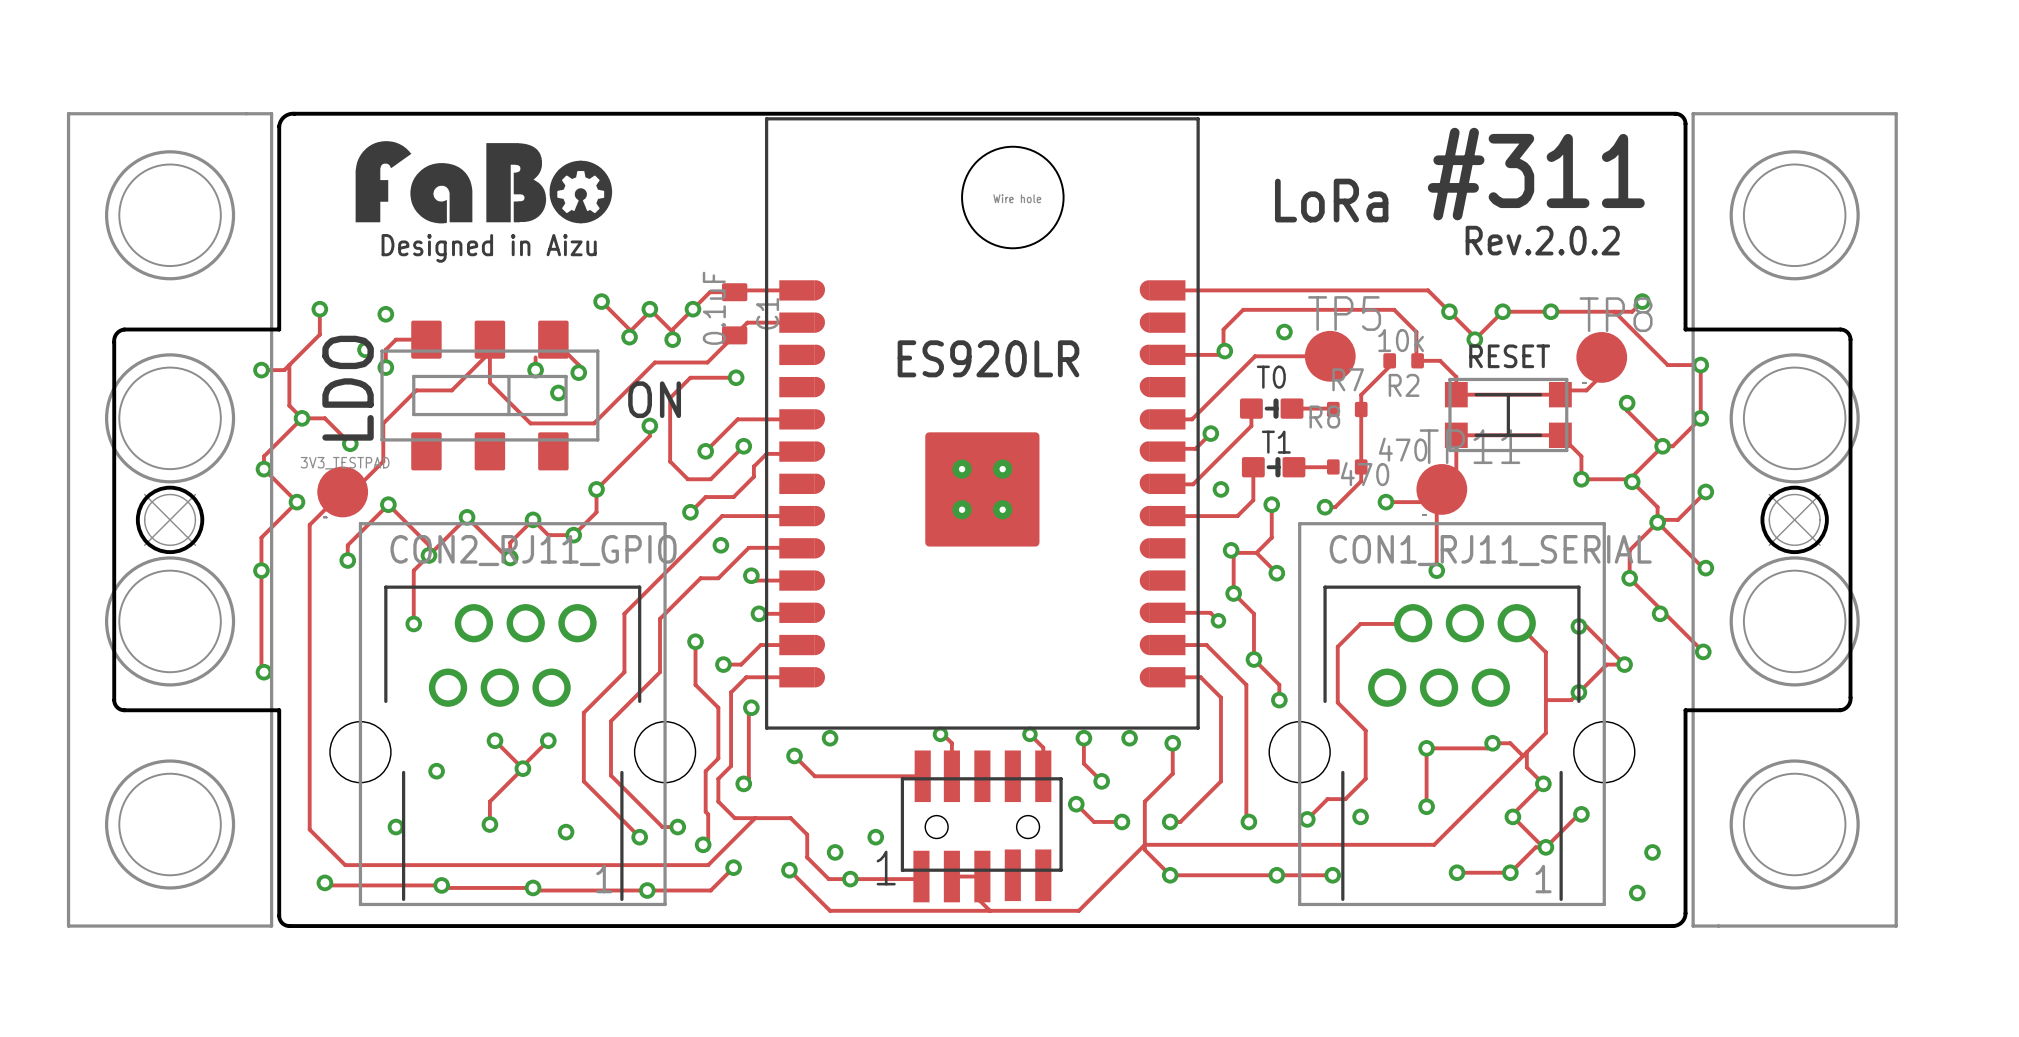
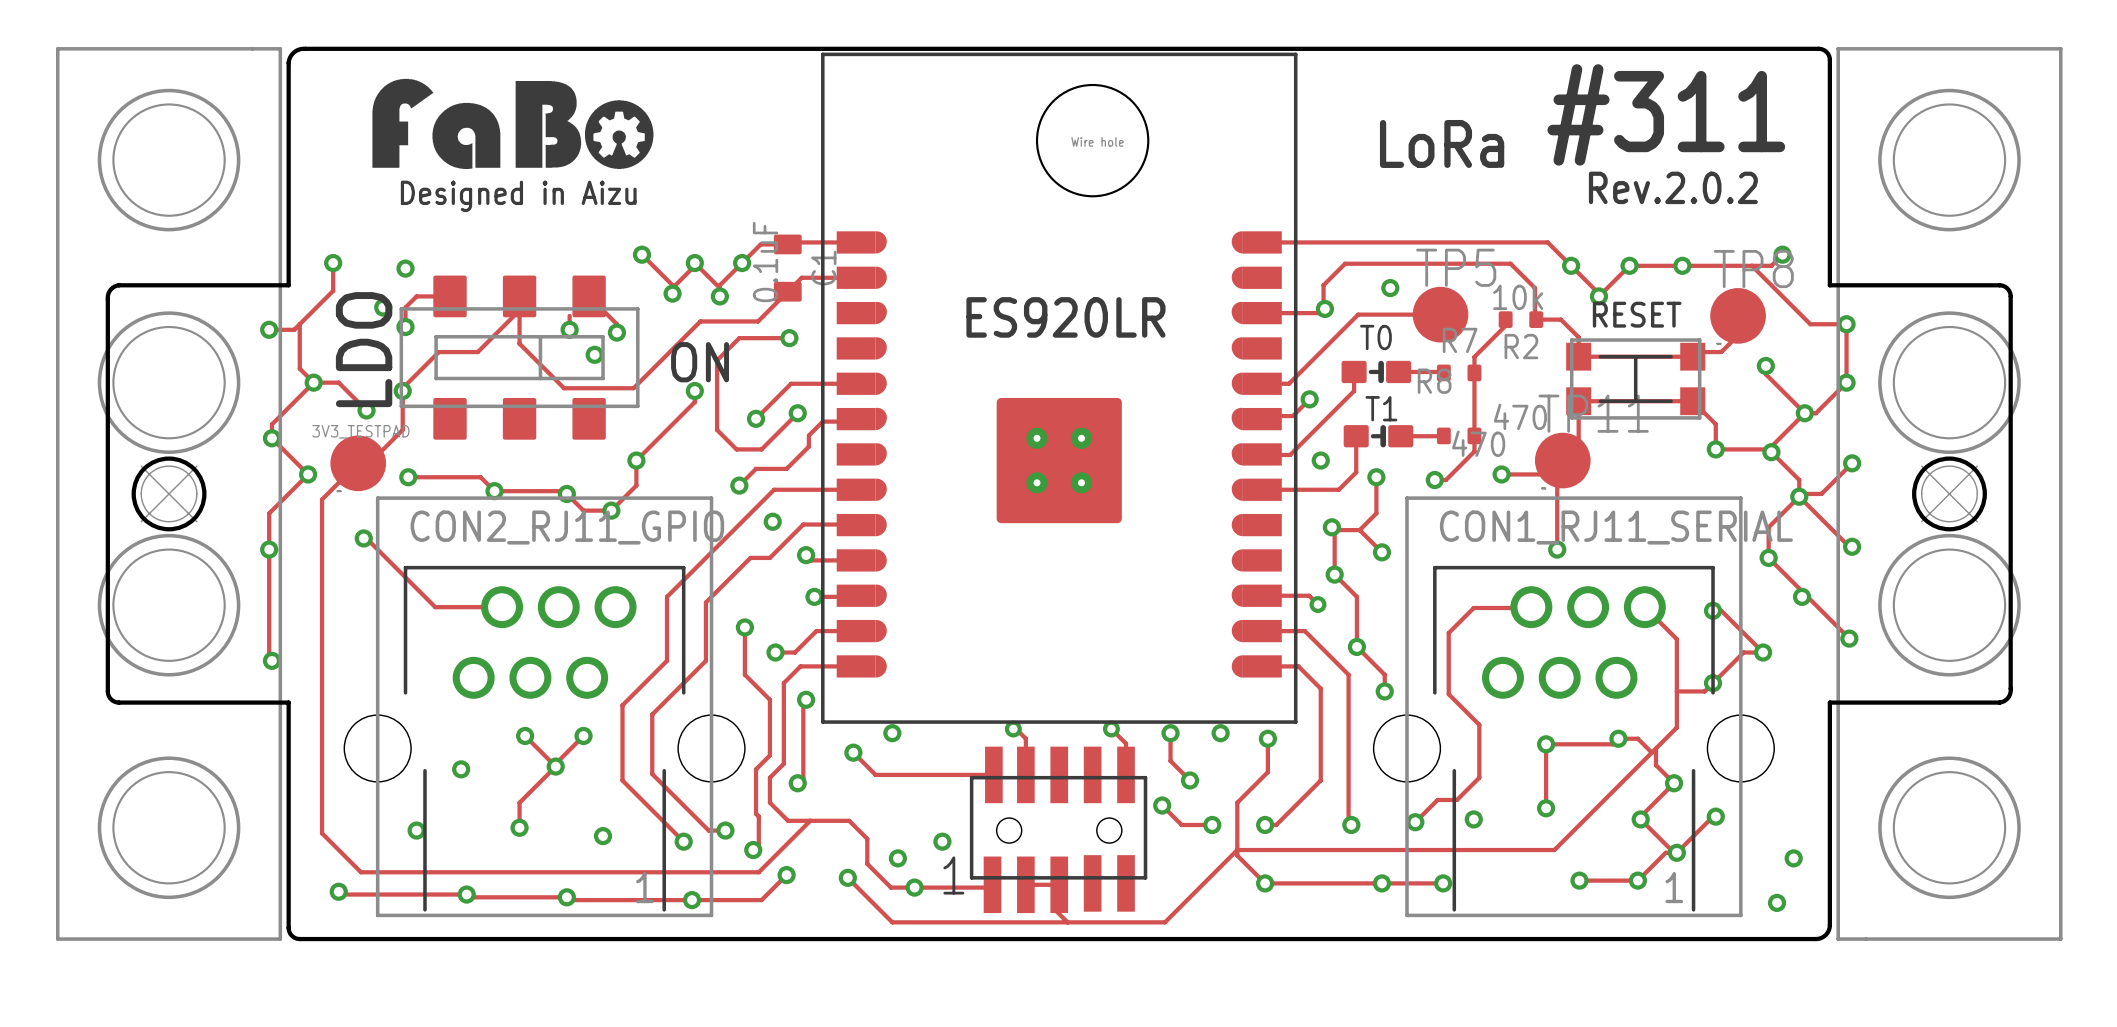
via: none -> (402, 391)
track: (533, 519) (510, 542) (510, 557) (507, 557) (467, 517) (413, 570) (413, 623) -> (566, 493) (564, 491) (494, 491) (480, 477) (408, 477)
track: (428, 555) (428, 545) (388, 504) (347, 545) (347, 560) -> none
via: (428, 555) -> none
track: none -> (363, 535) (435, 607) (502, 607)
via: (510, 557) -> none
via: (413, 623) -> none

